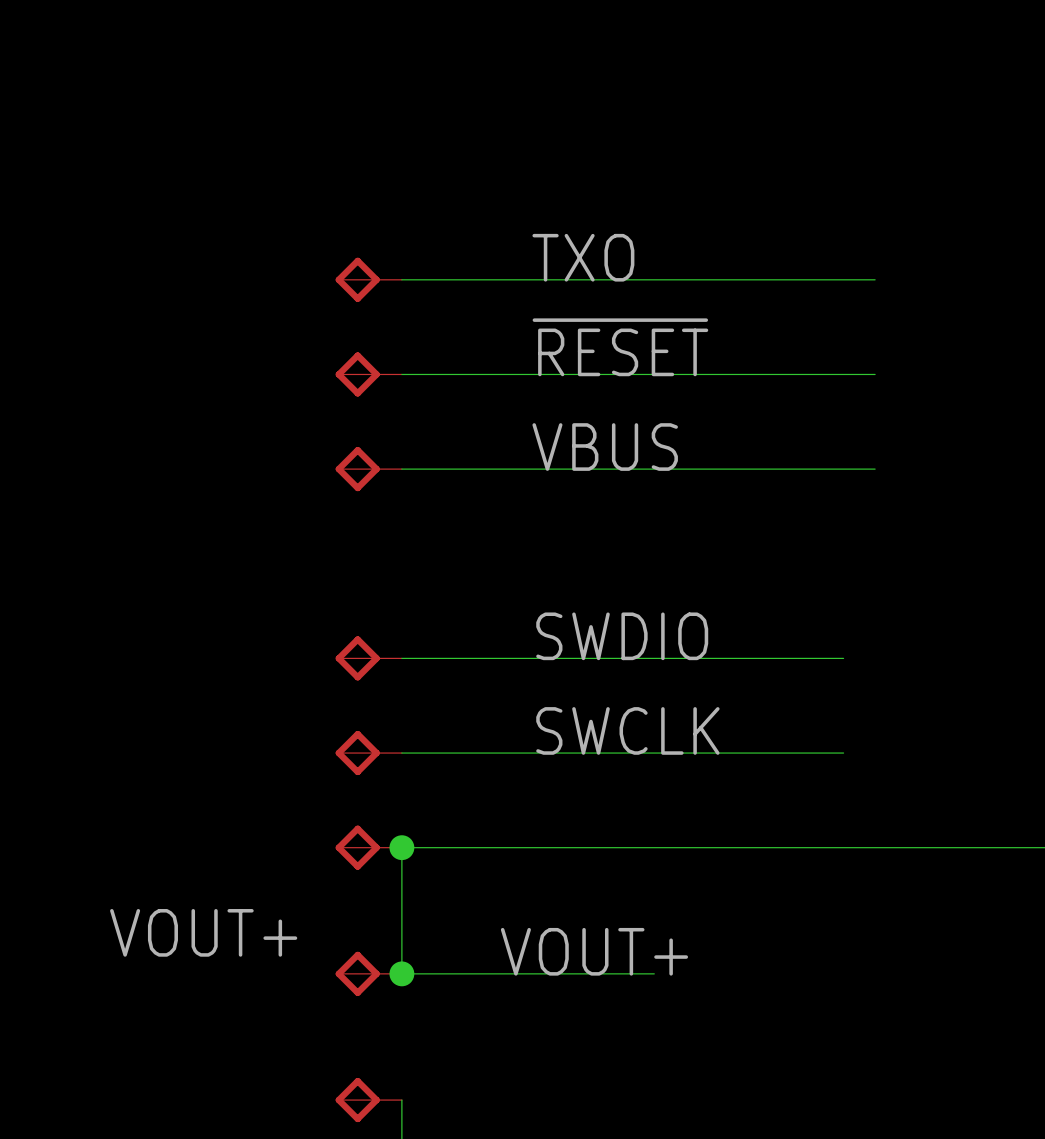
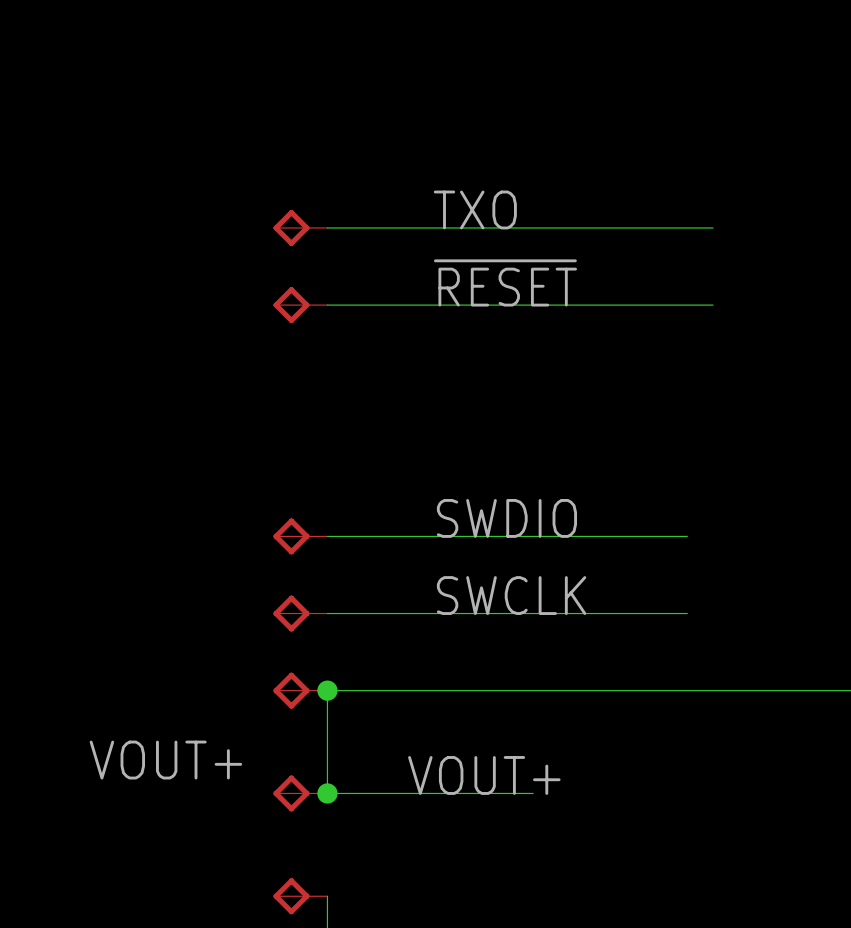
label: VBUS (605, 447) -> none
part: (368, 469) -> none
wire: (401, 469) (875, 469) -> none

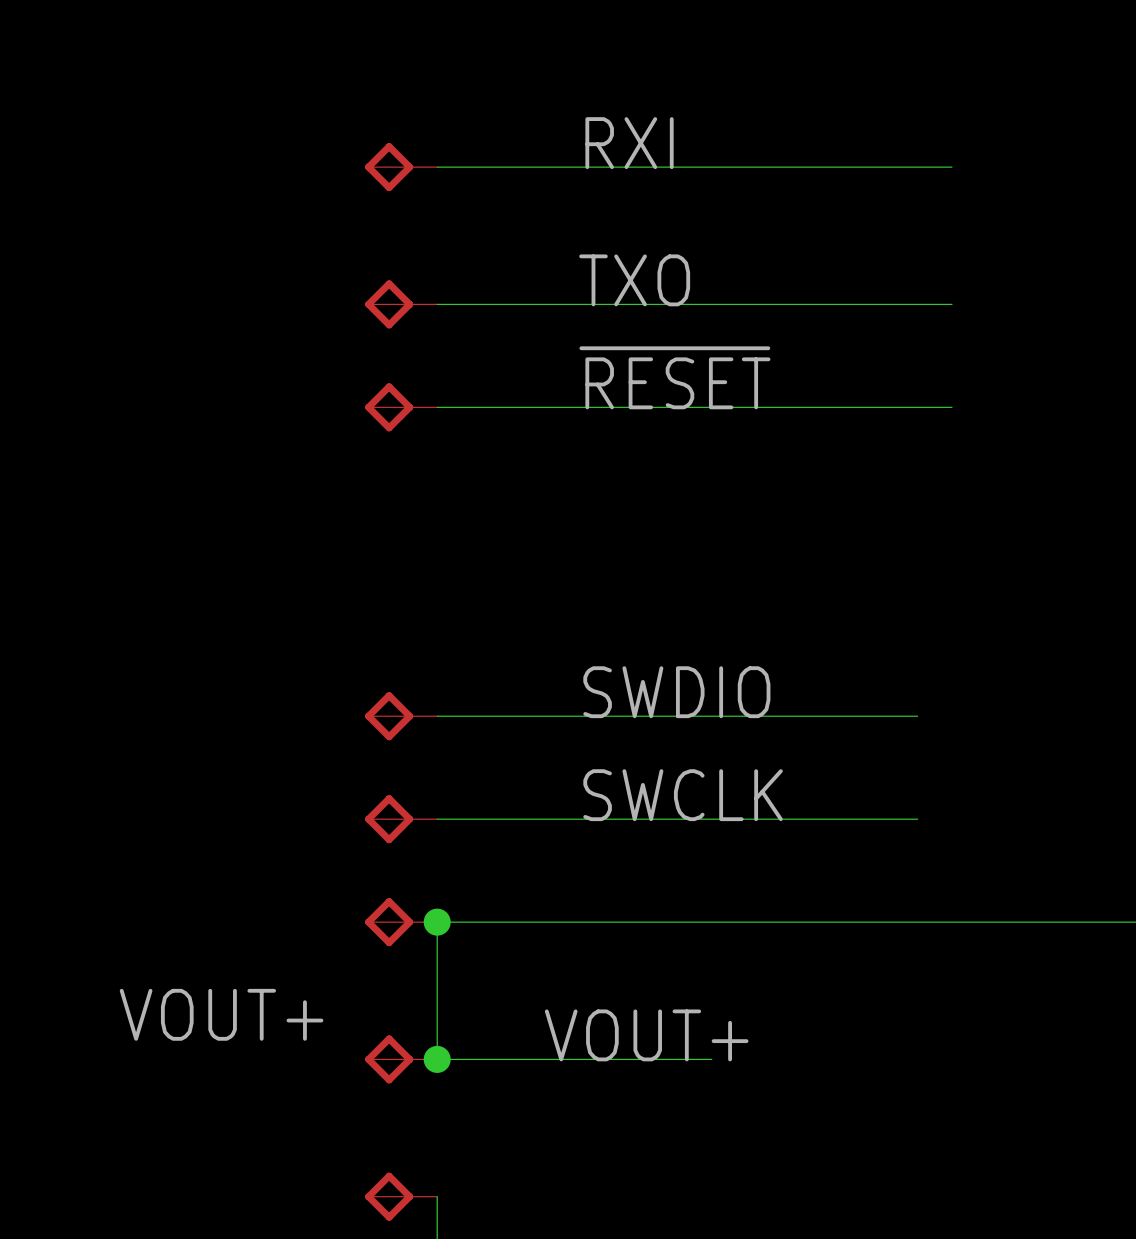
label: none -> RXI (629, 143)
part: none -> (401, 167)
wire: none -> (437, 167) (951, 167)

